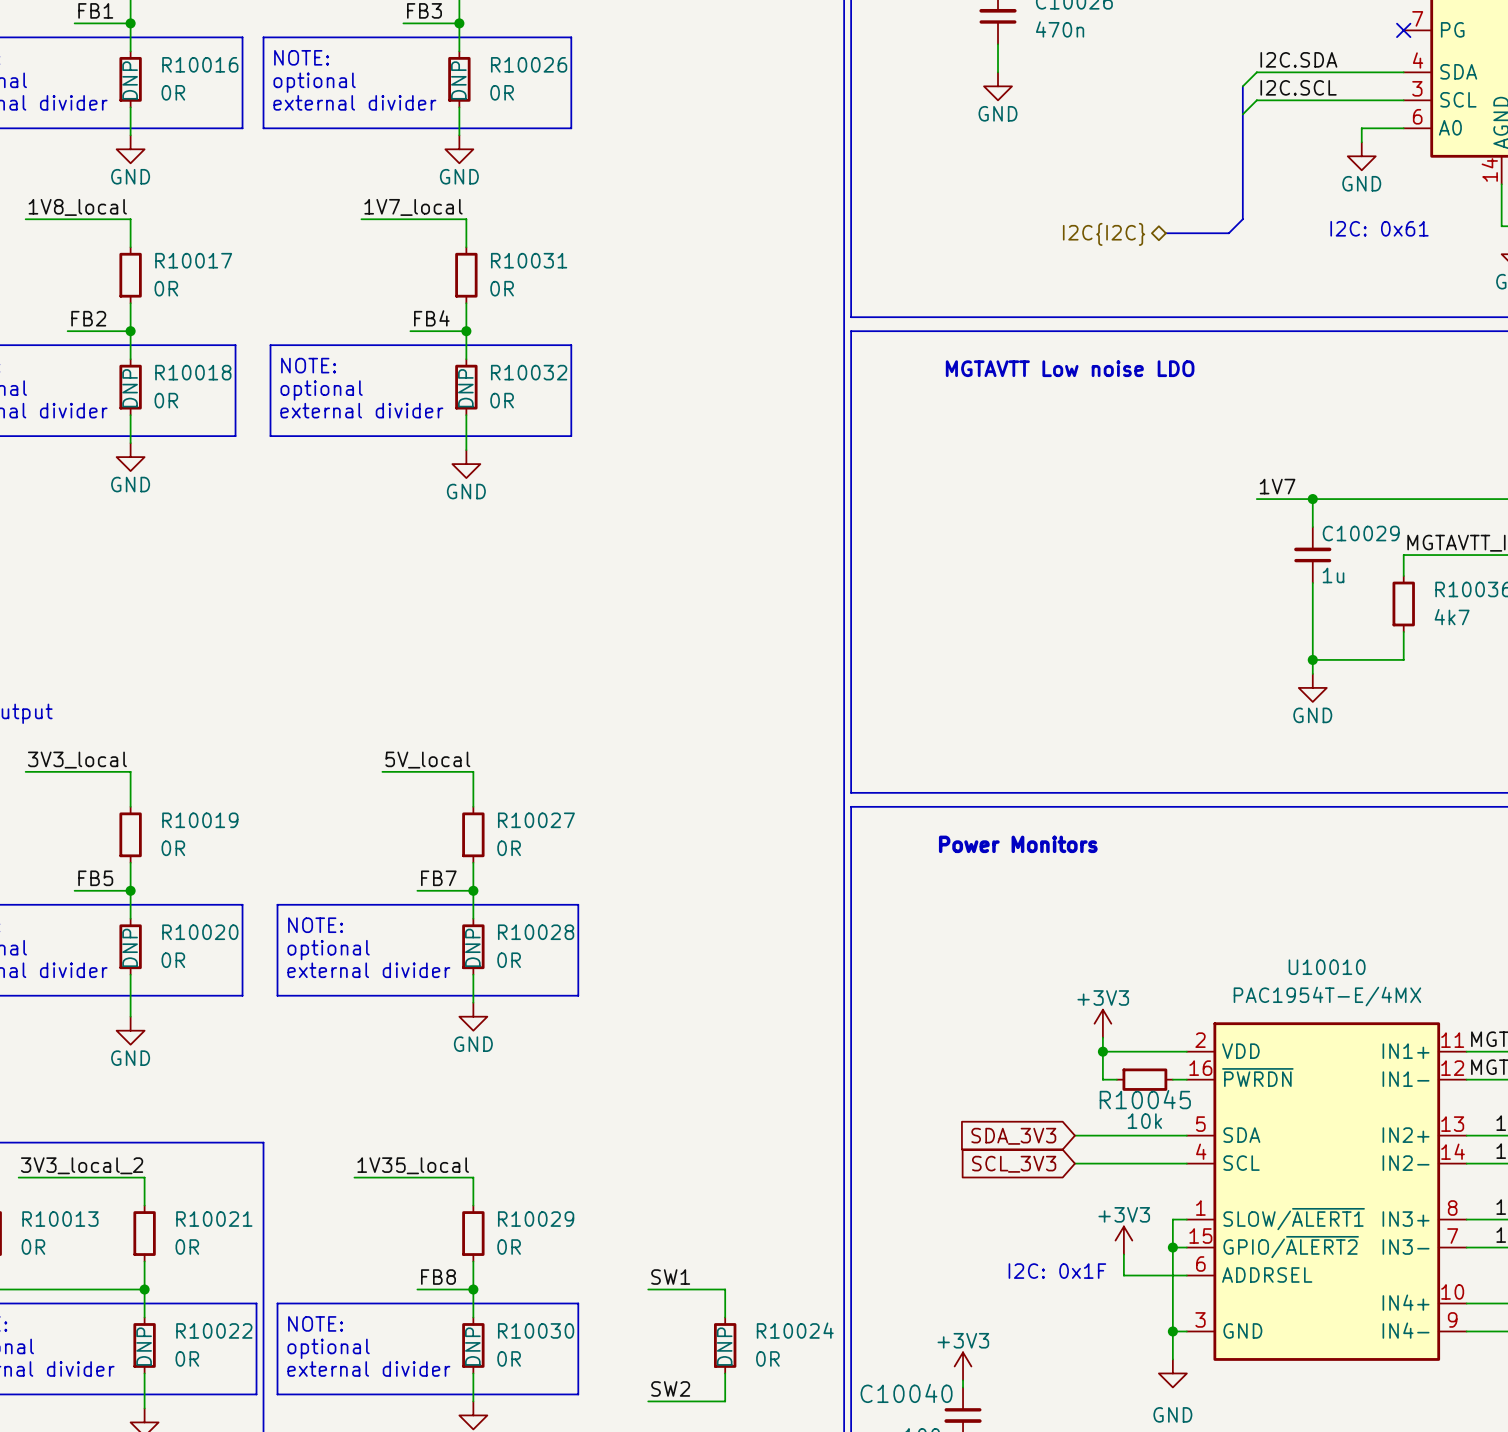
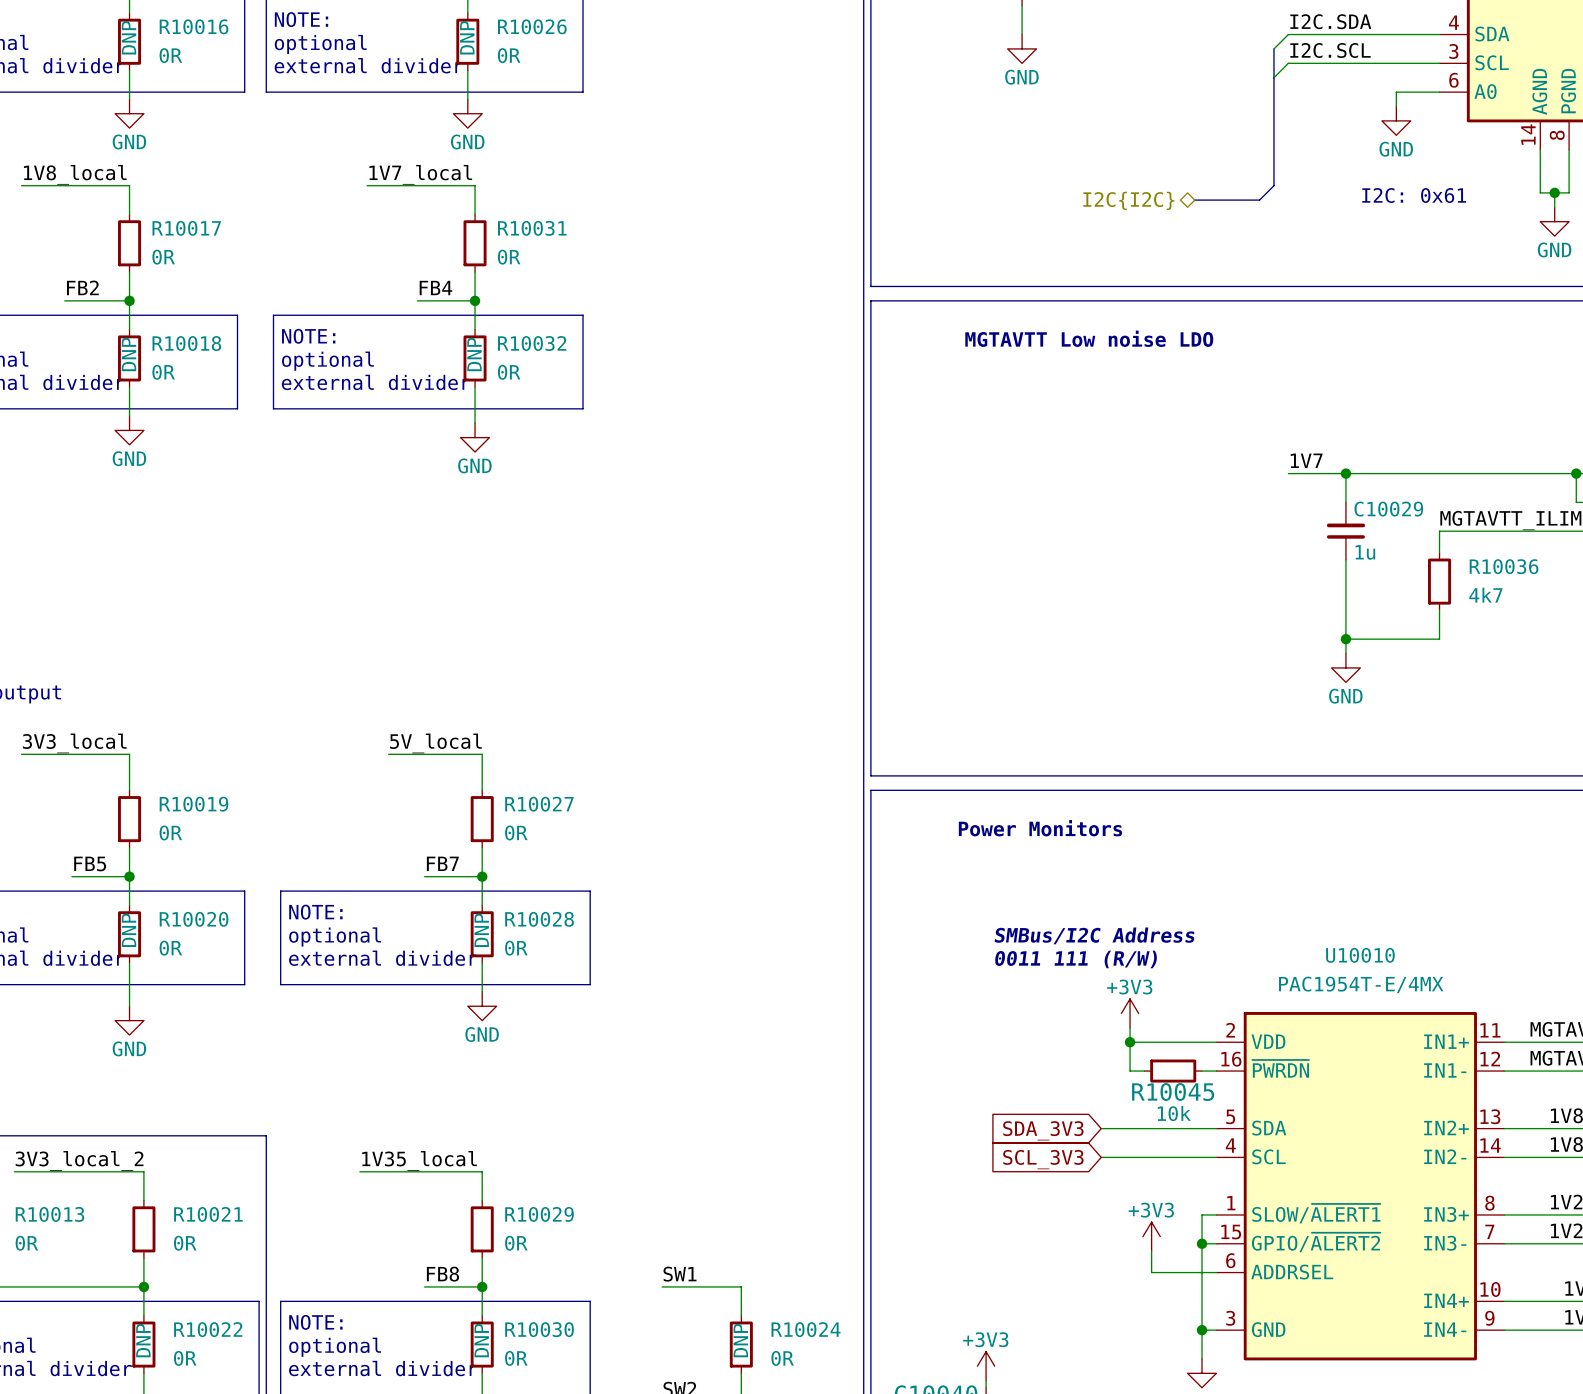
text: none -> SMBus/I2C Address (1094, 935)
text: none -> 0011 111 (R/W) (1075, 959)
text: I2C: 0x1F (1057, 1271) -> none

